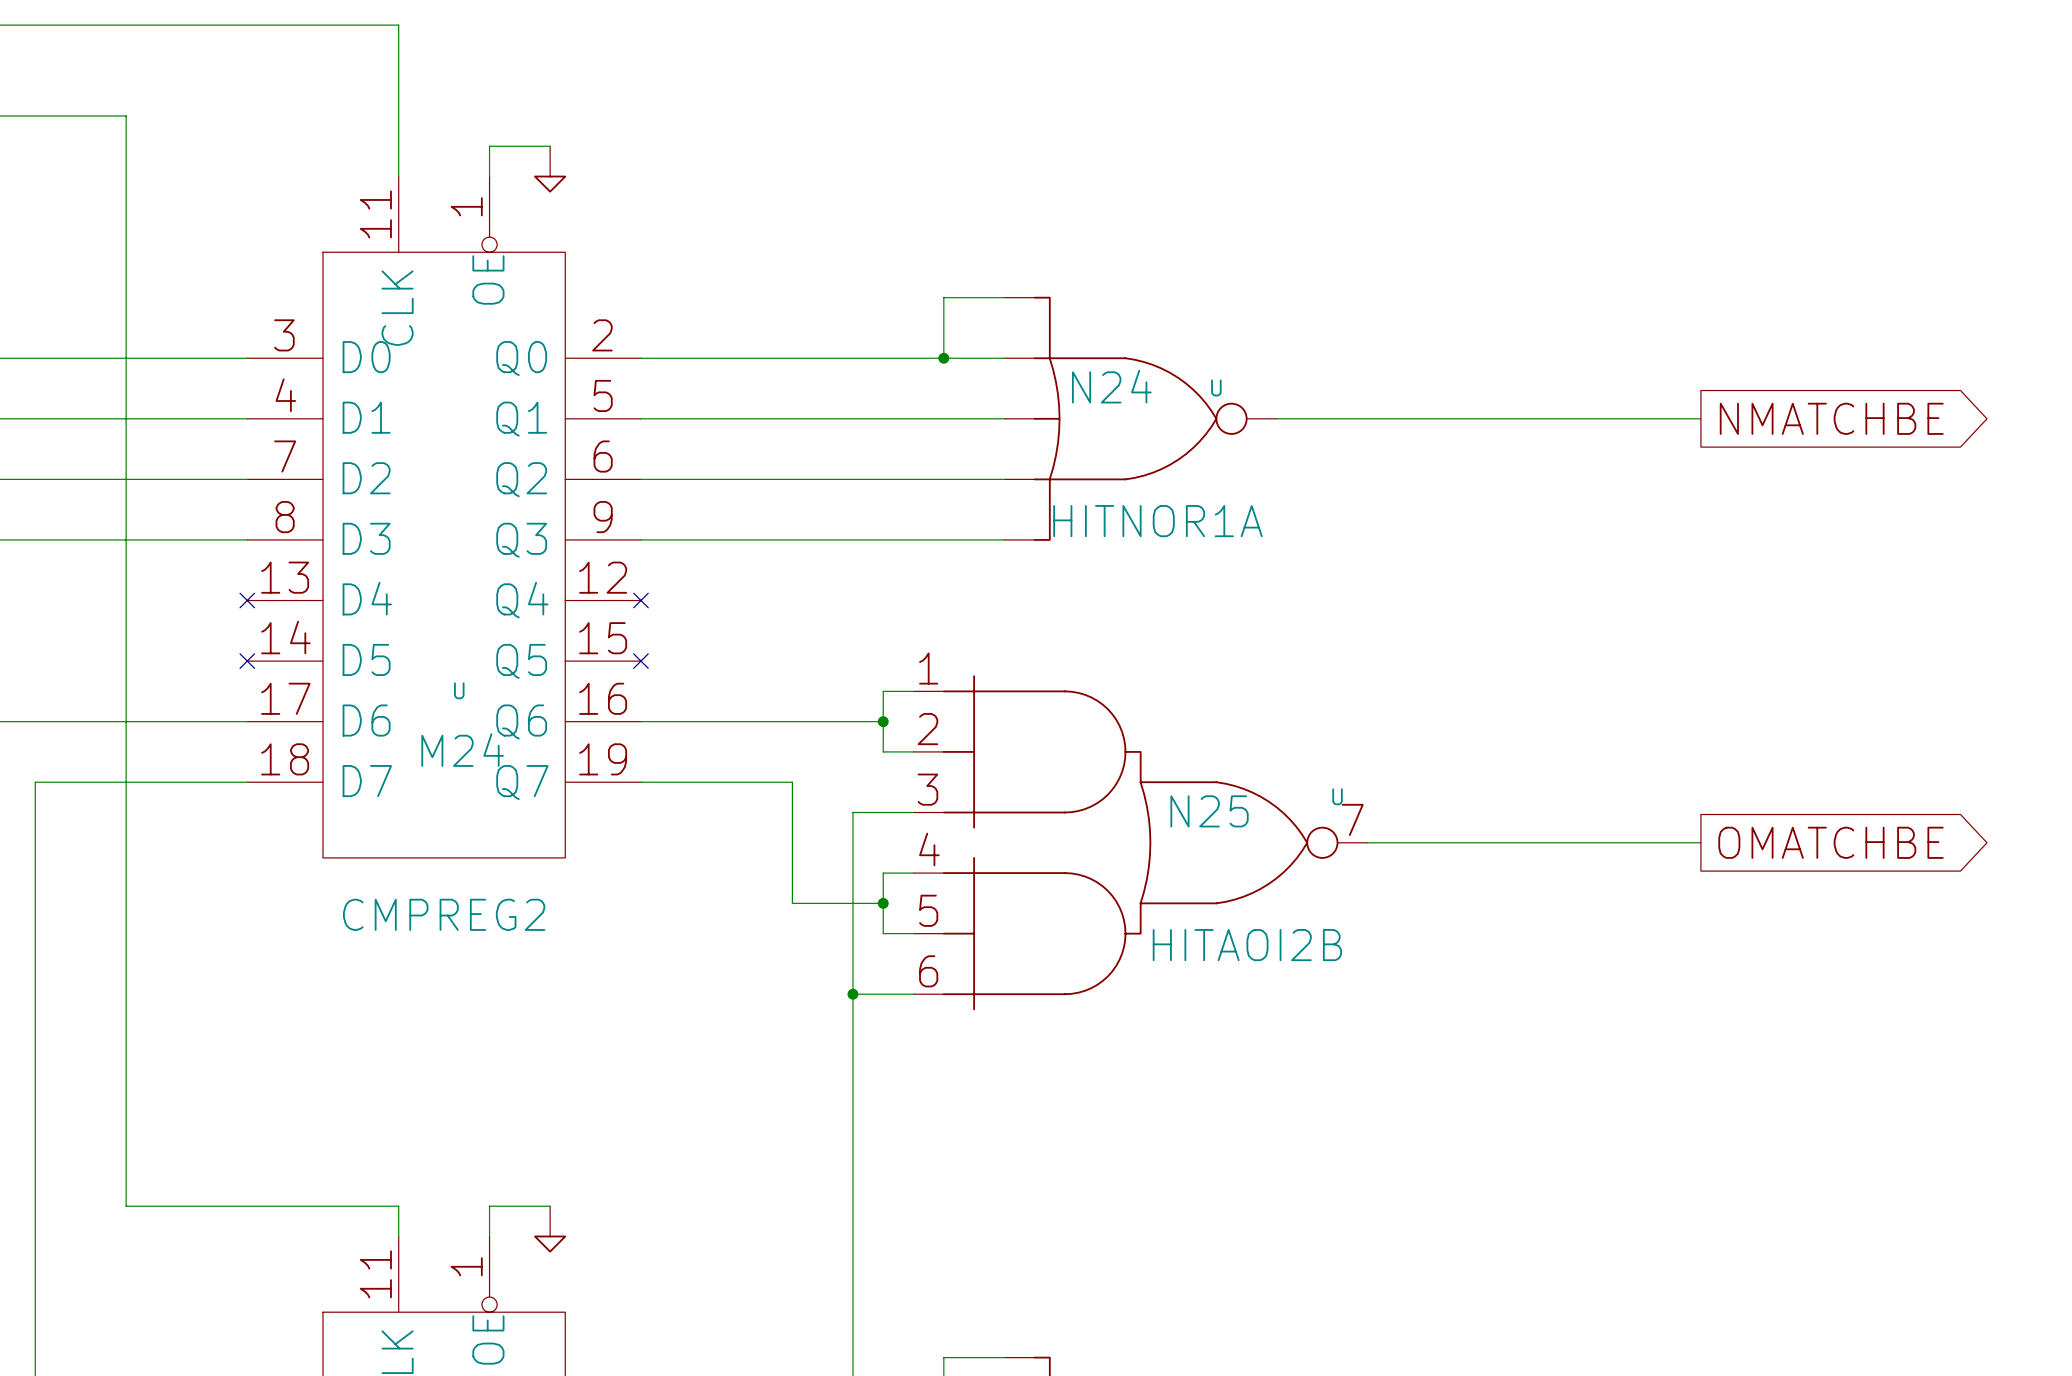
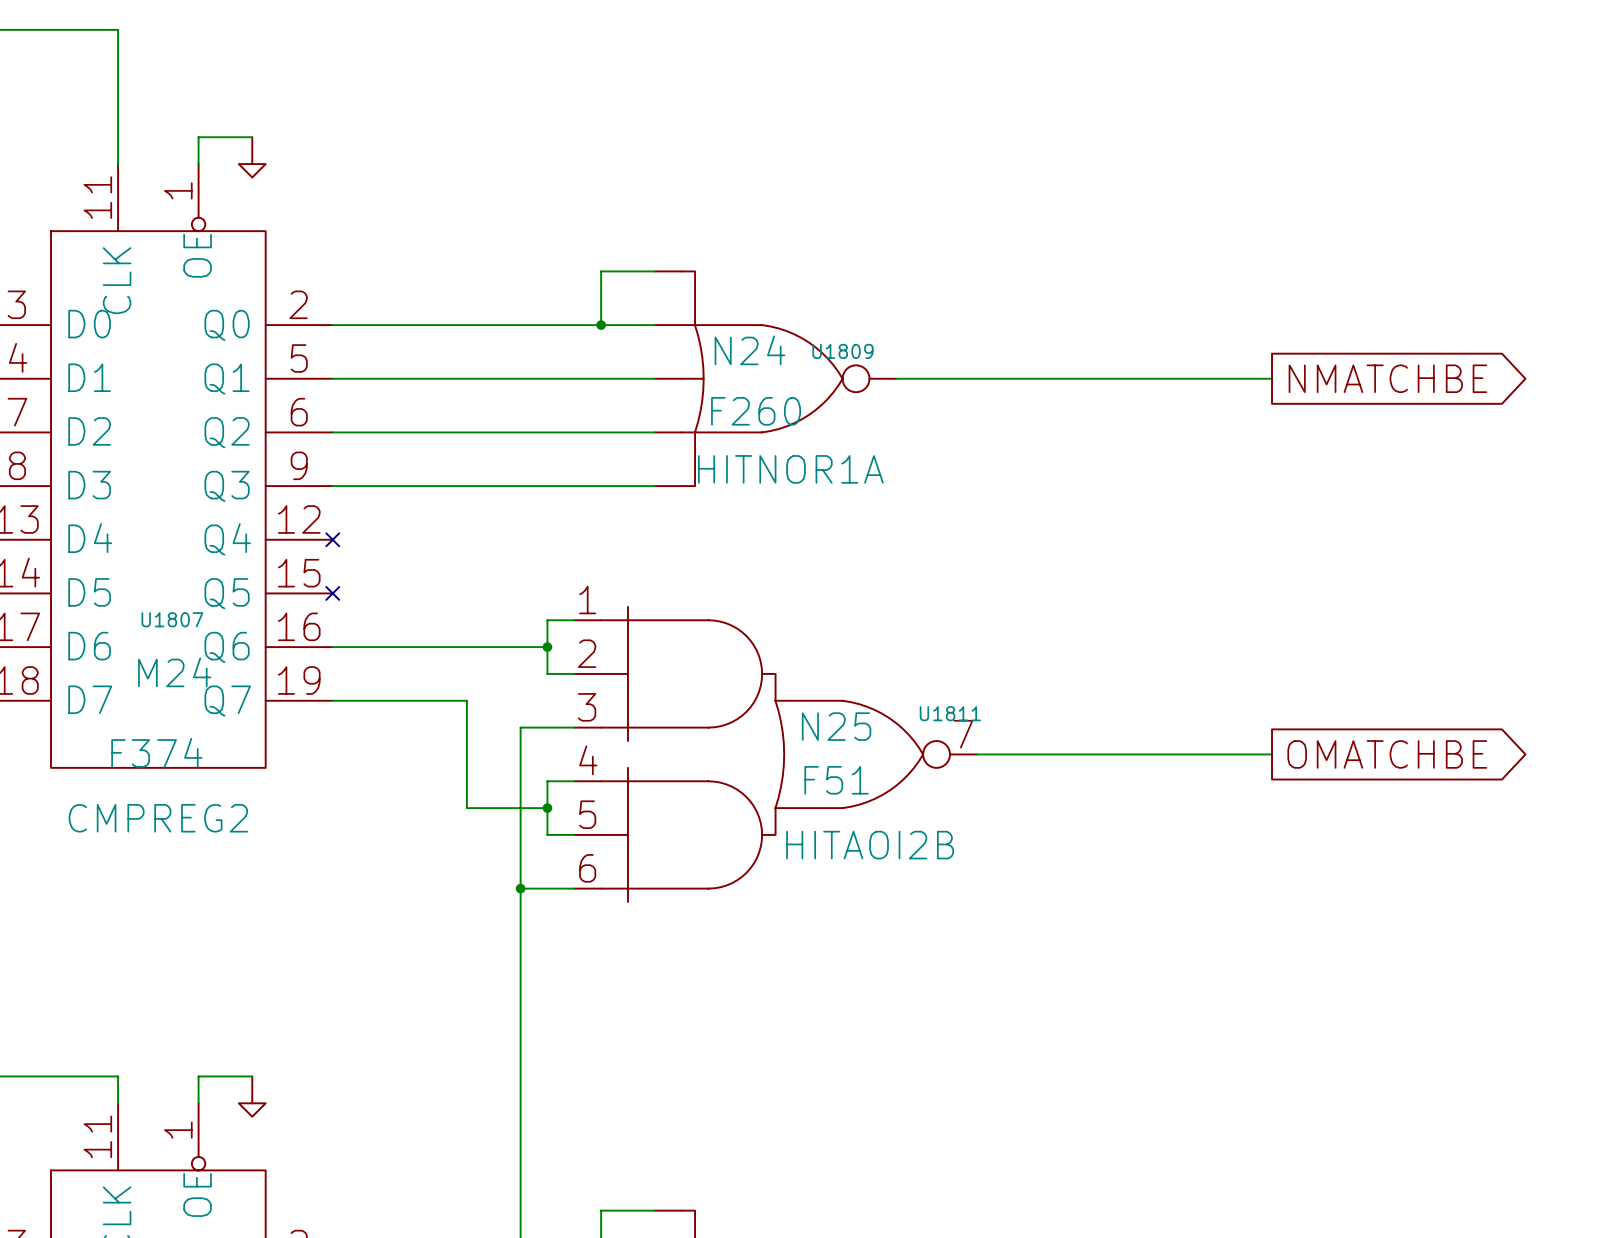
U name: U (1216, 387) -> U1809 (842, 351)
U value: none -> F260 (756, 411)
U name: U (459, 690) -> U1807 (172, 619)
U name: U (1337, 796) -> U1811 (950, 713)
U value: none -> F374 (156, 752)
U value: none -> F51 (836, 780)

